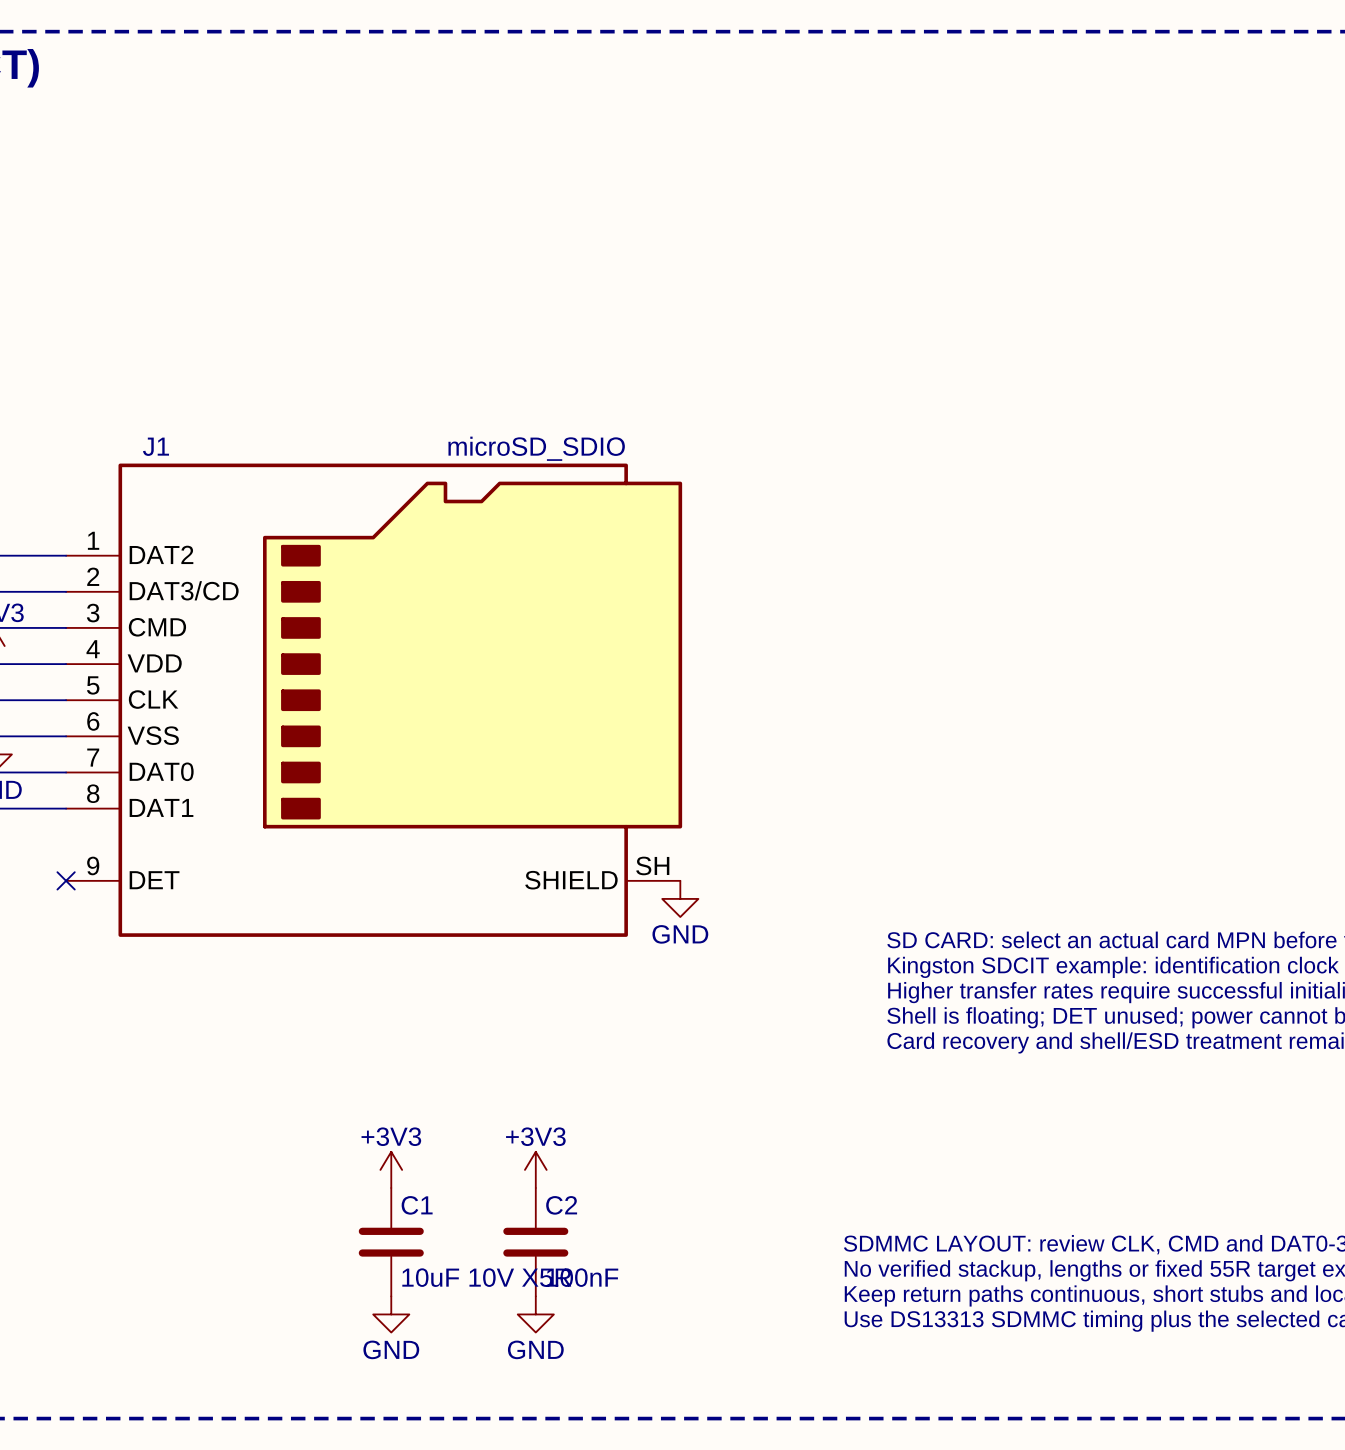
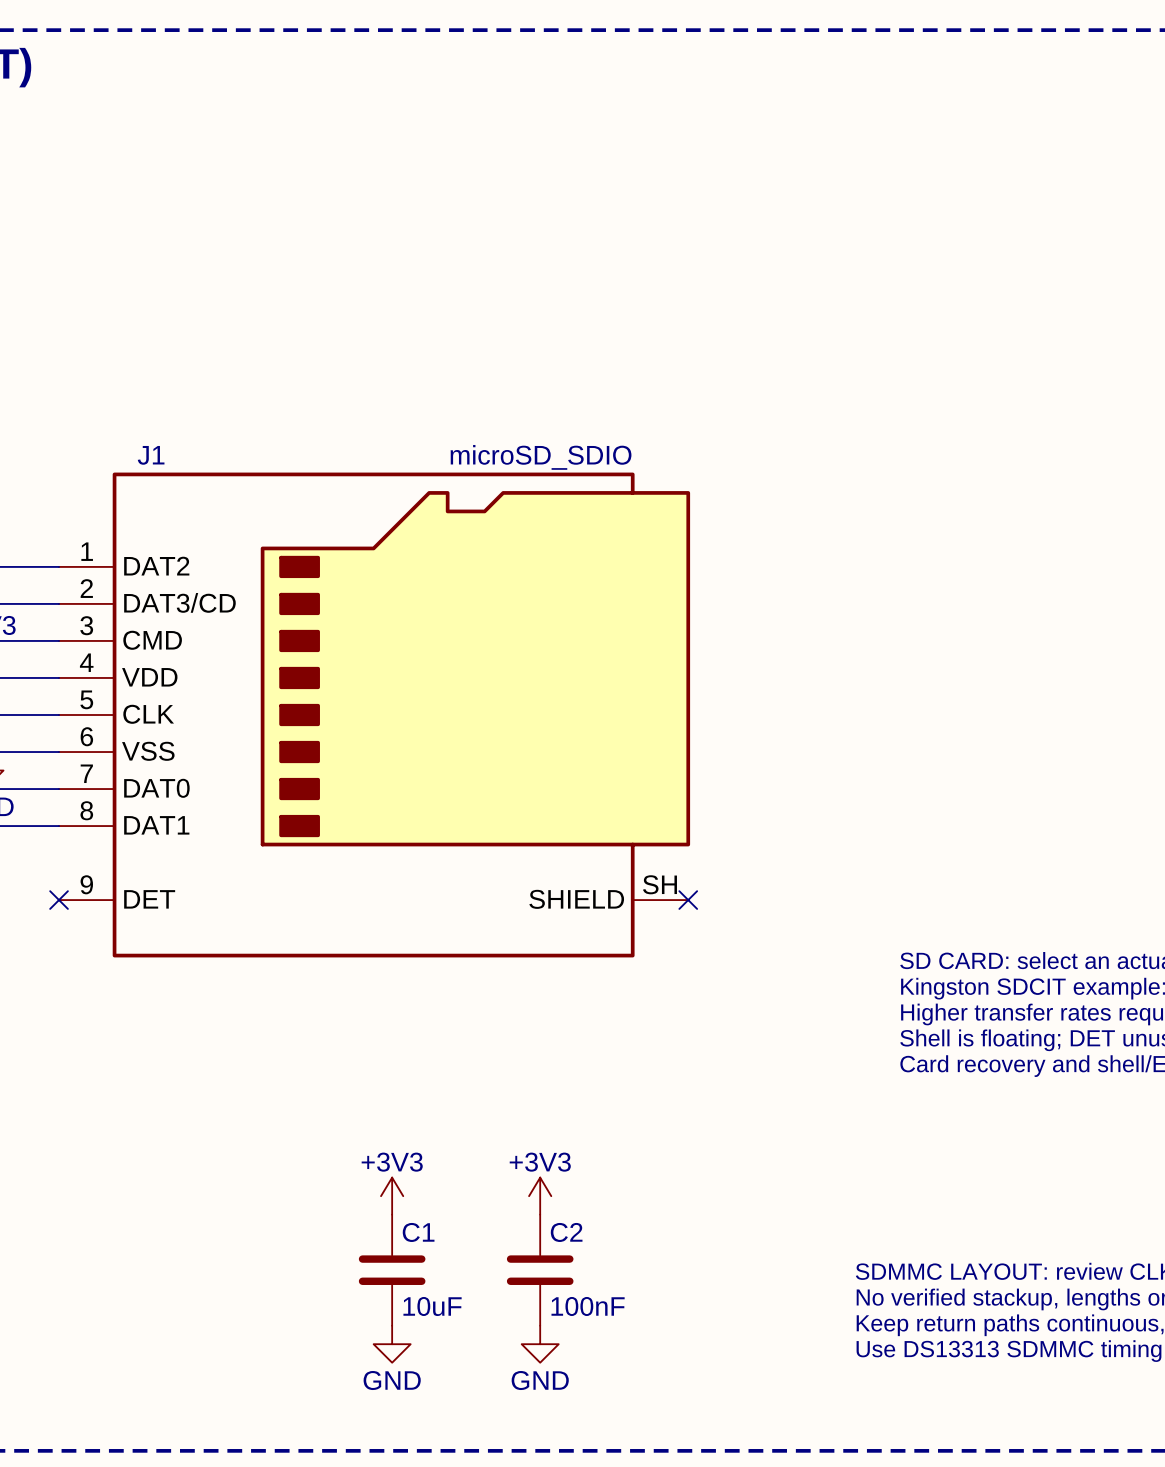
no-connect mark: none -> (688, 900)
power symbol: GND (680, 898) -> none
C1 value: 10uF 10V X5R (486, 1277) -> 10uF (432, 1306)

